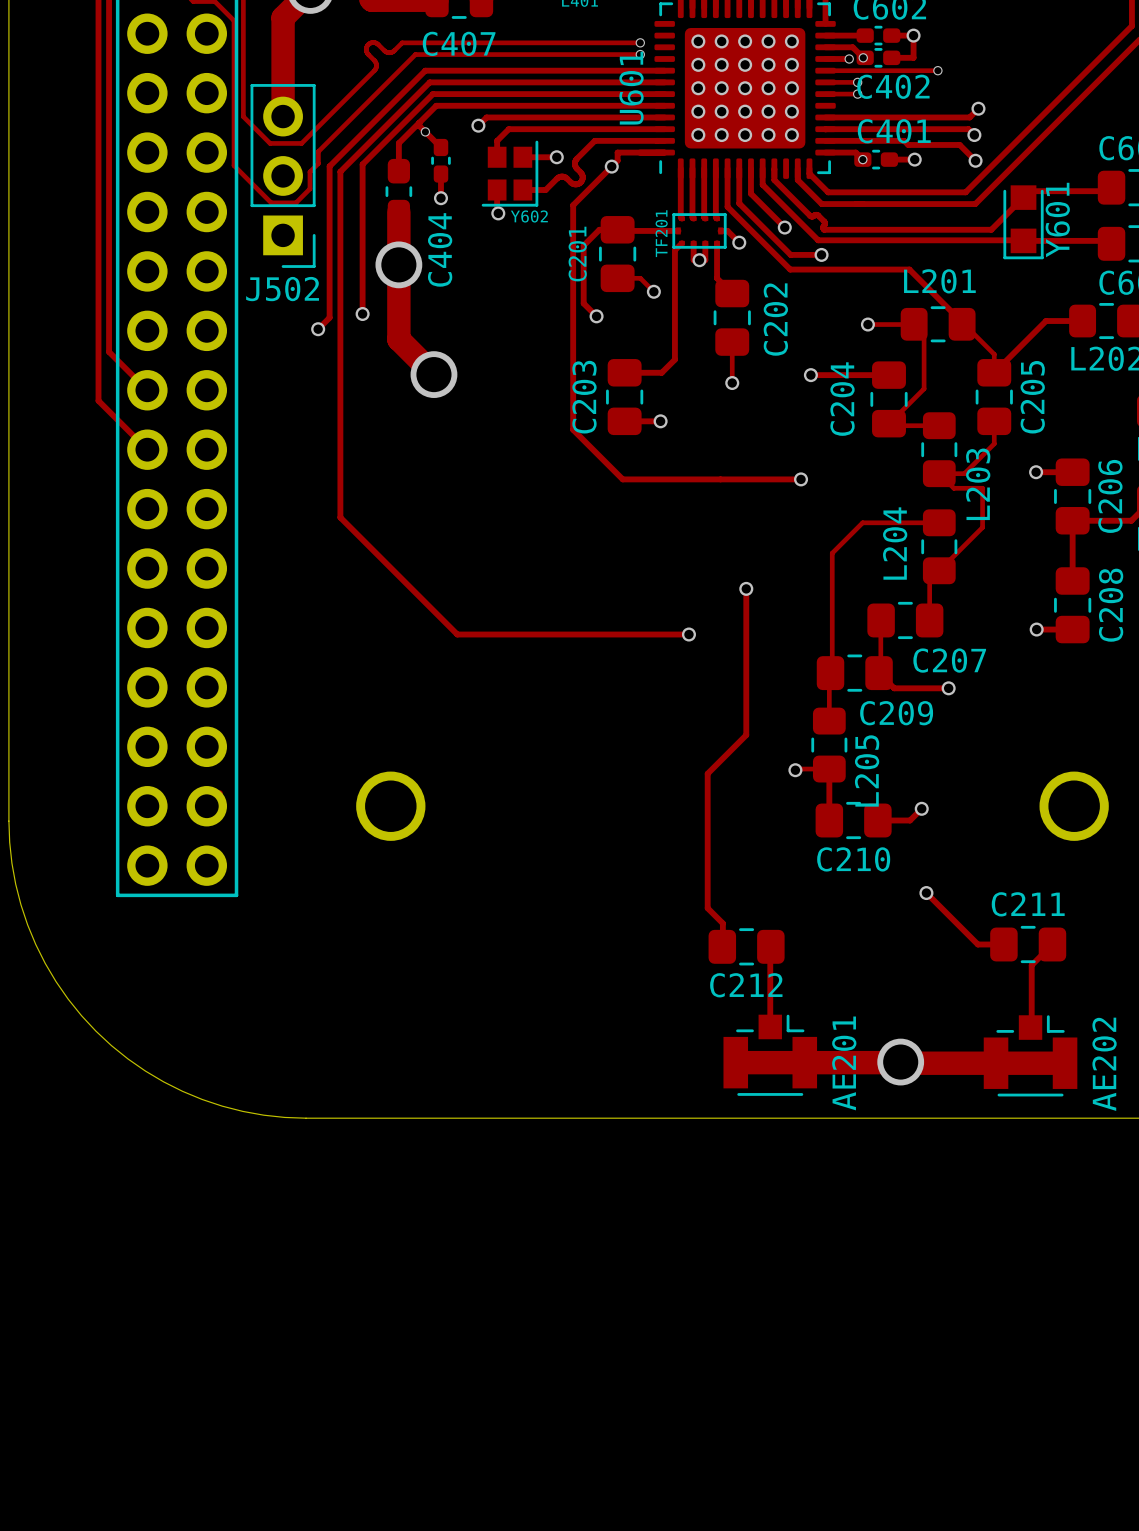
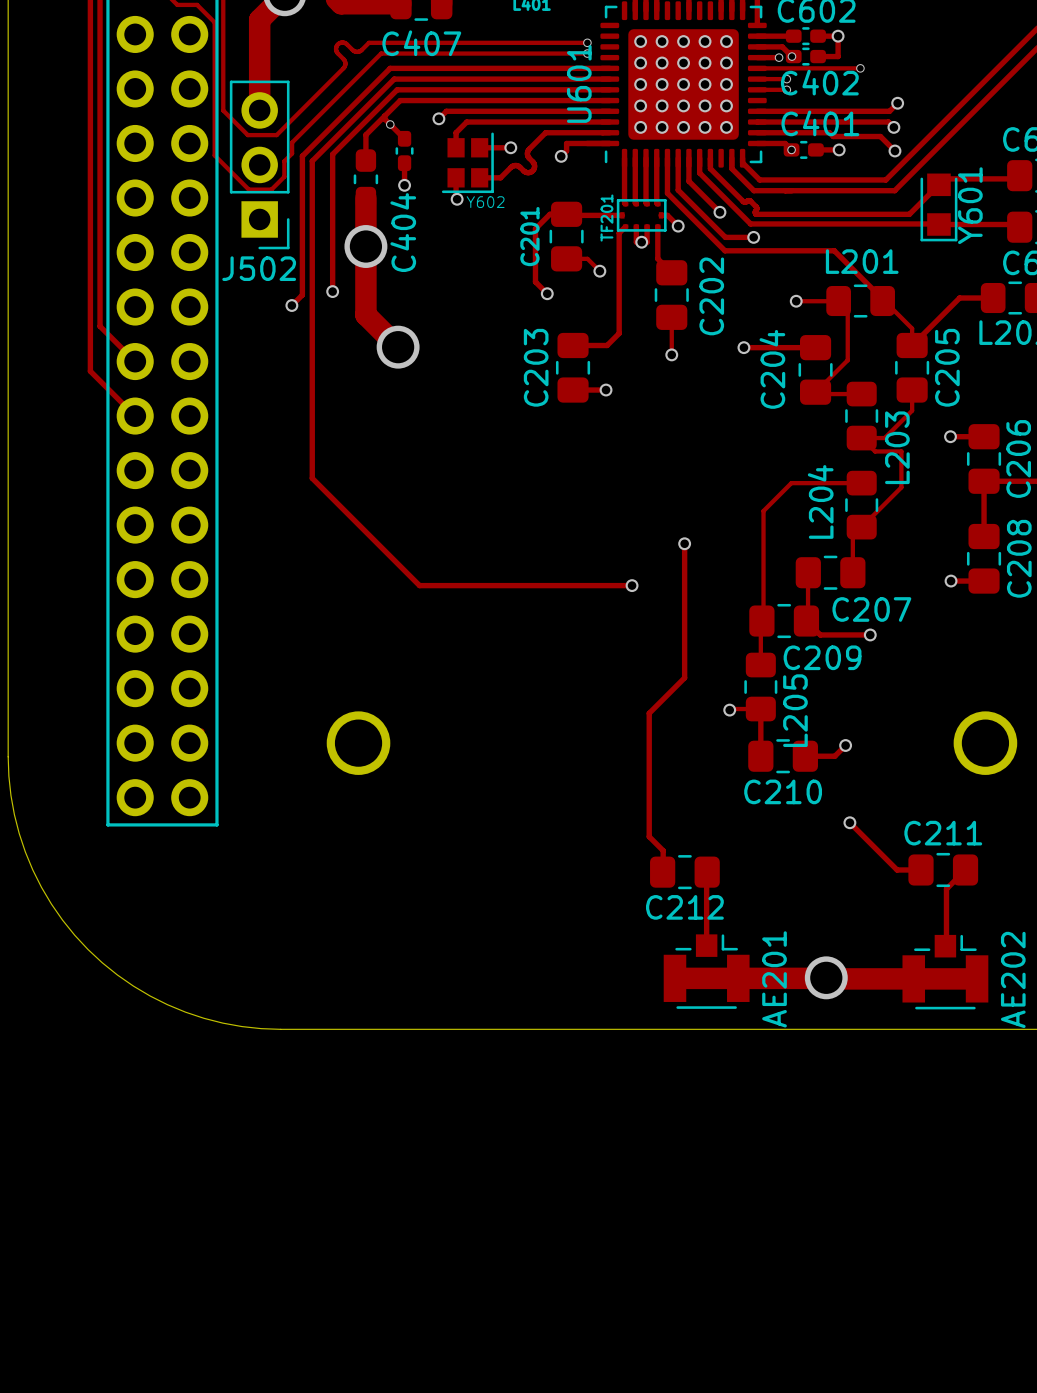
track: (611, 166) (573, 205) (573, 429) (622, 479) (801, 479) -> none
via: (801, 479) -> none

